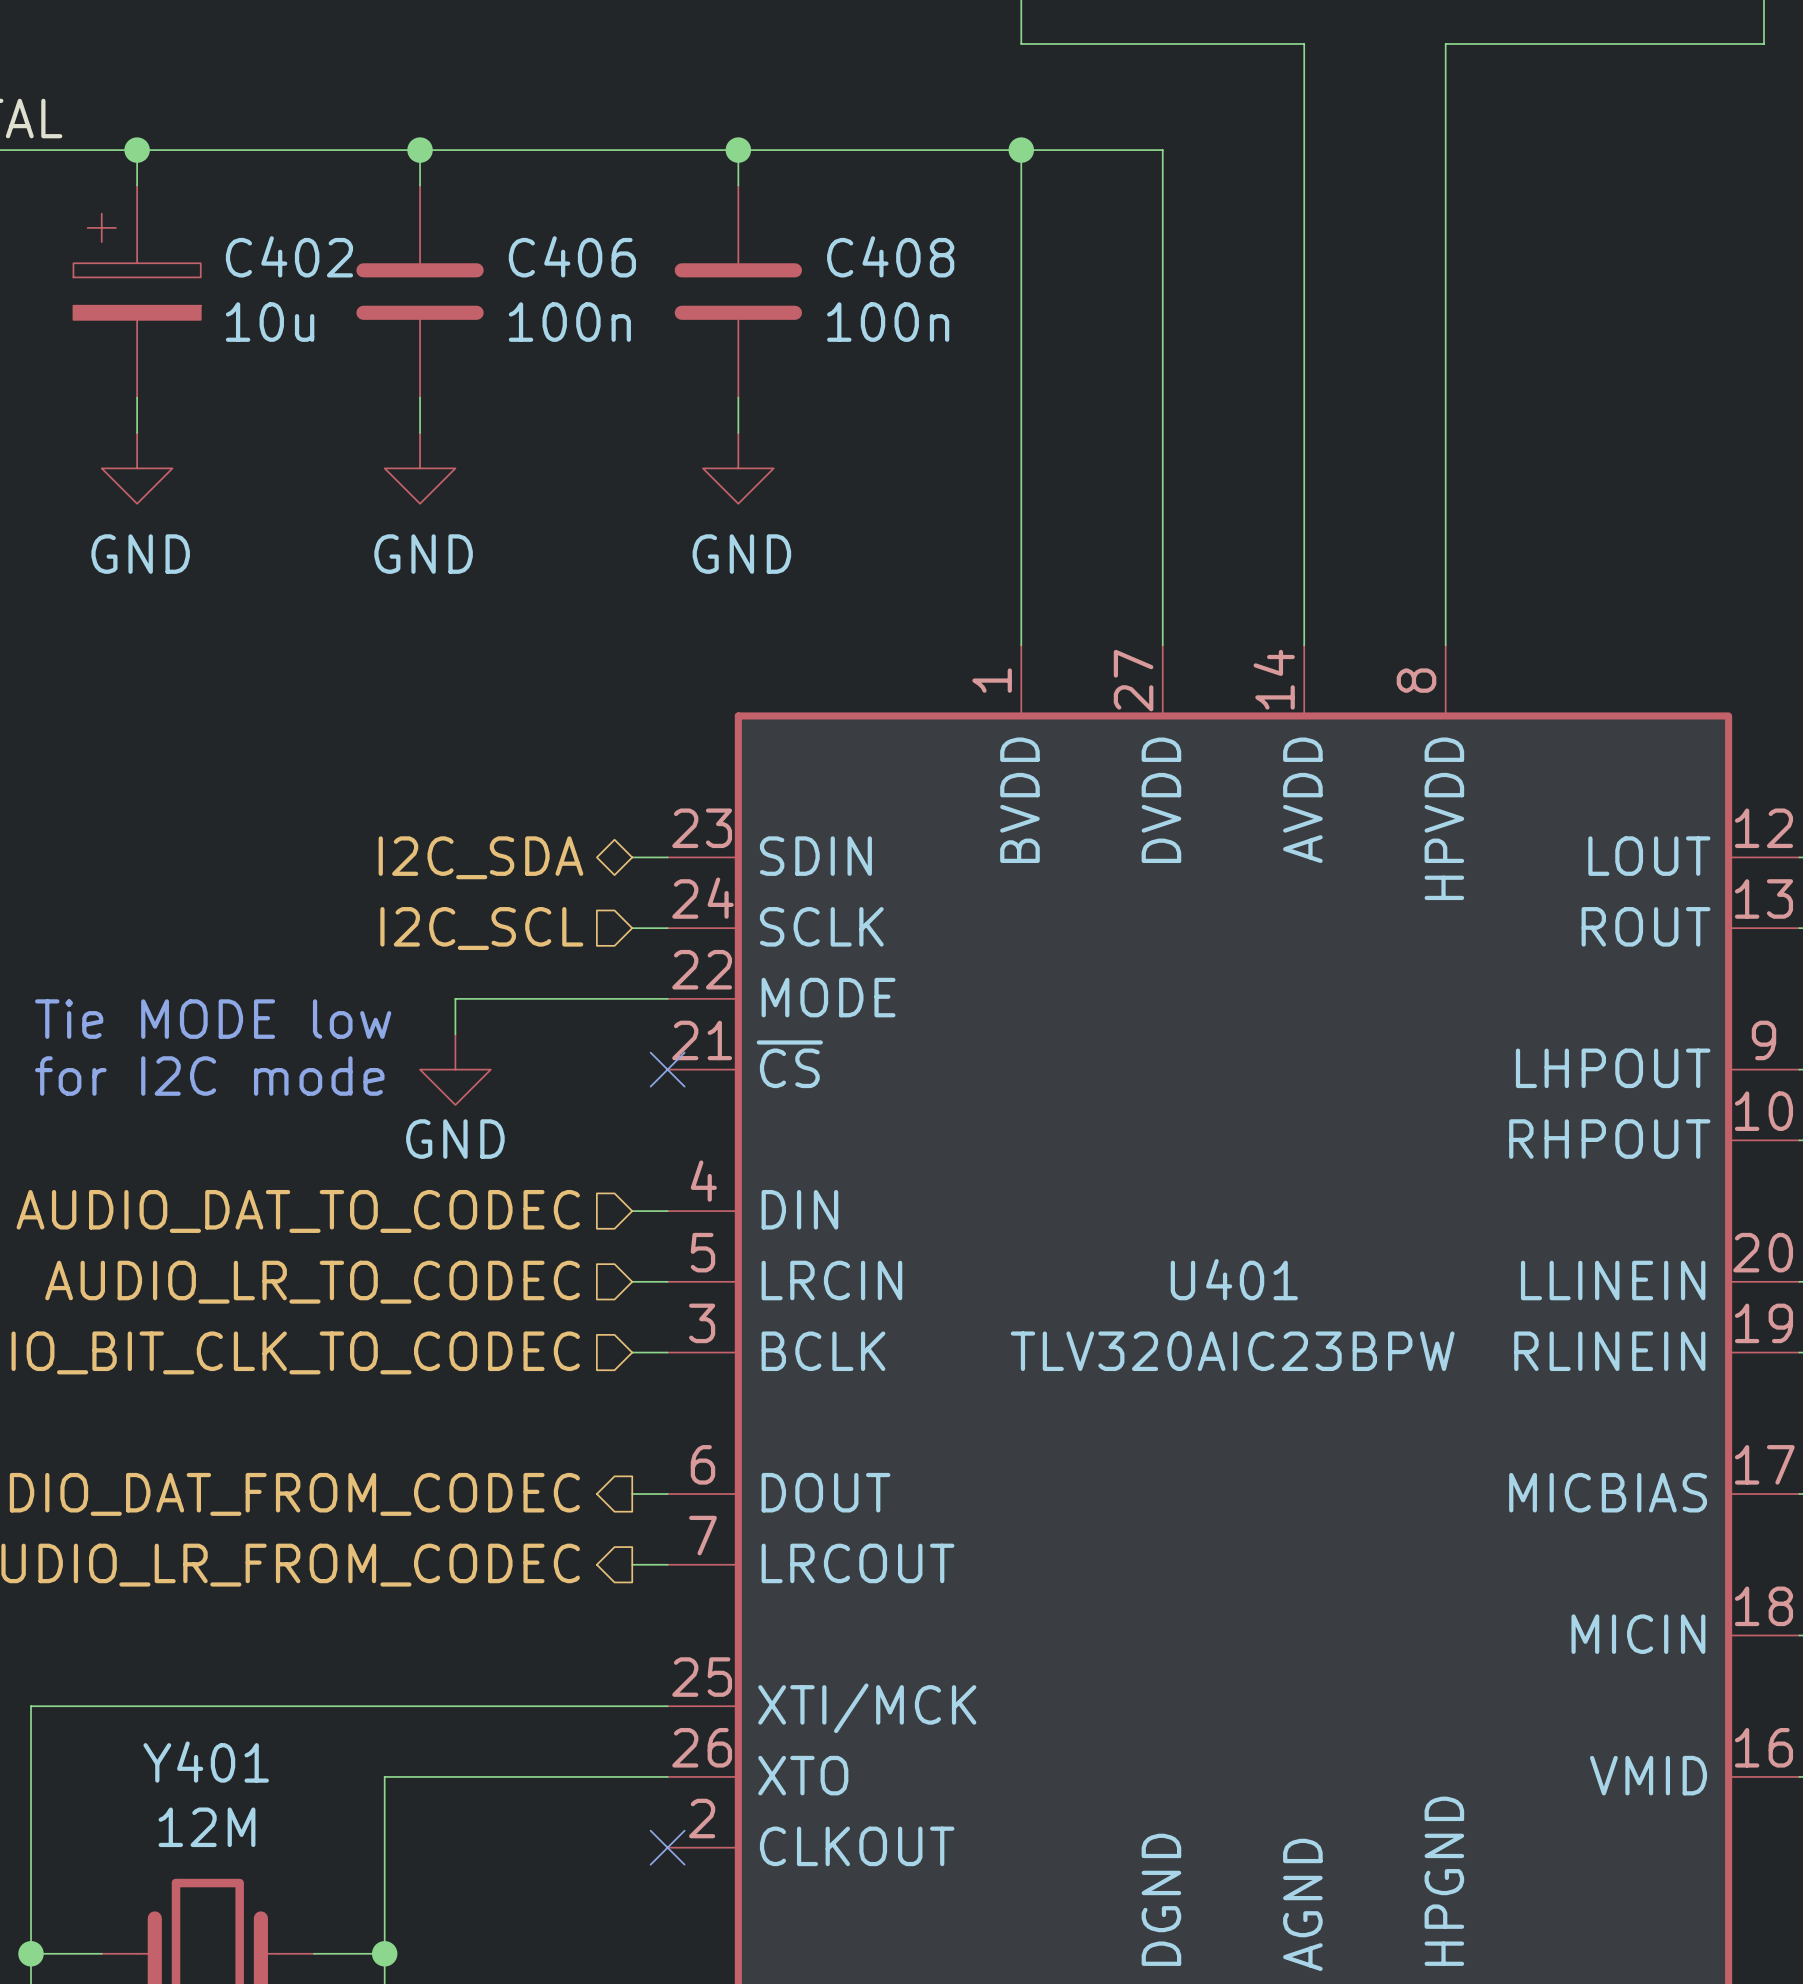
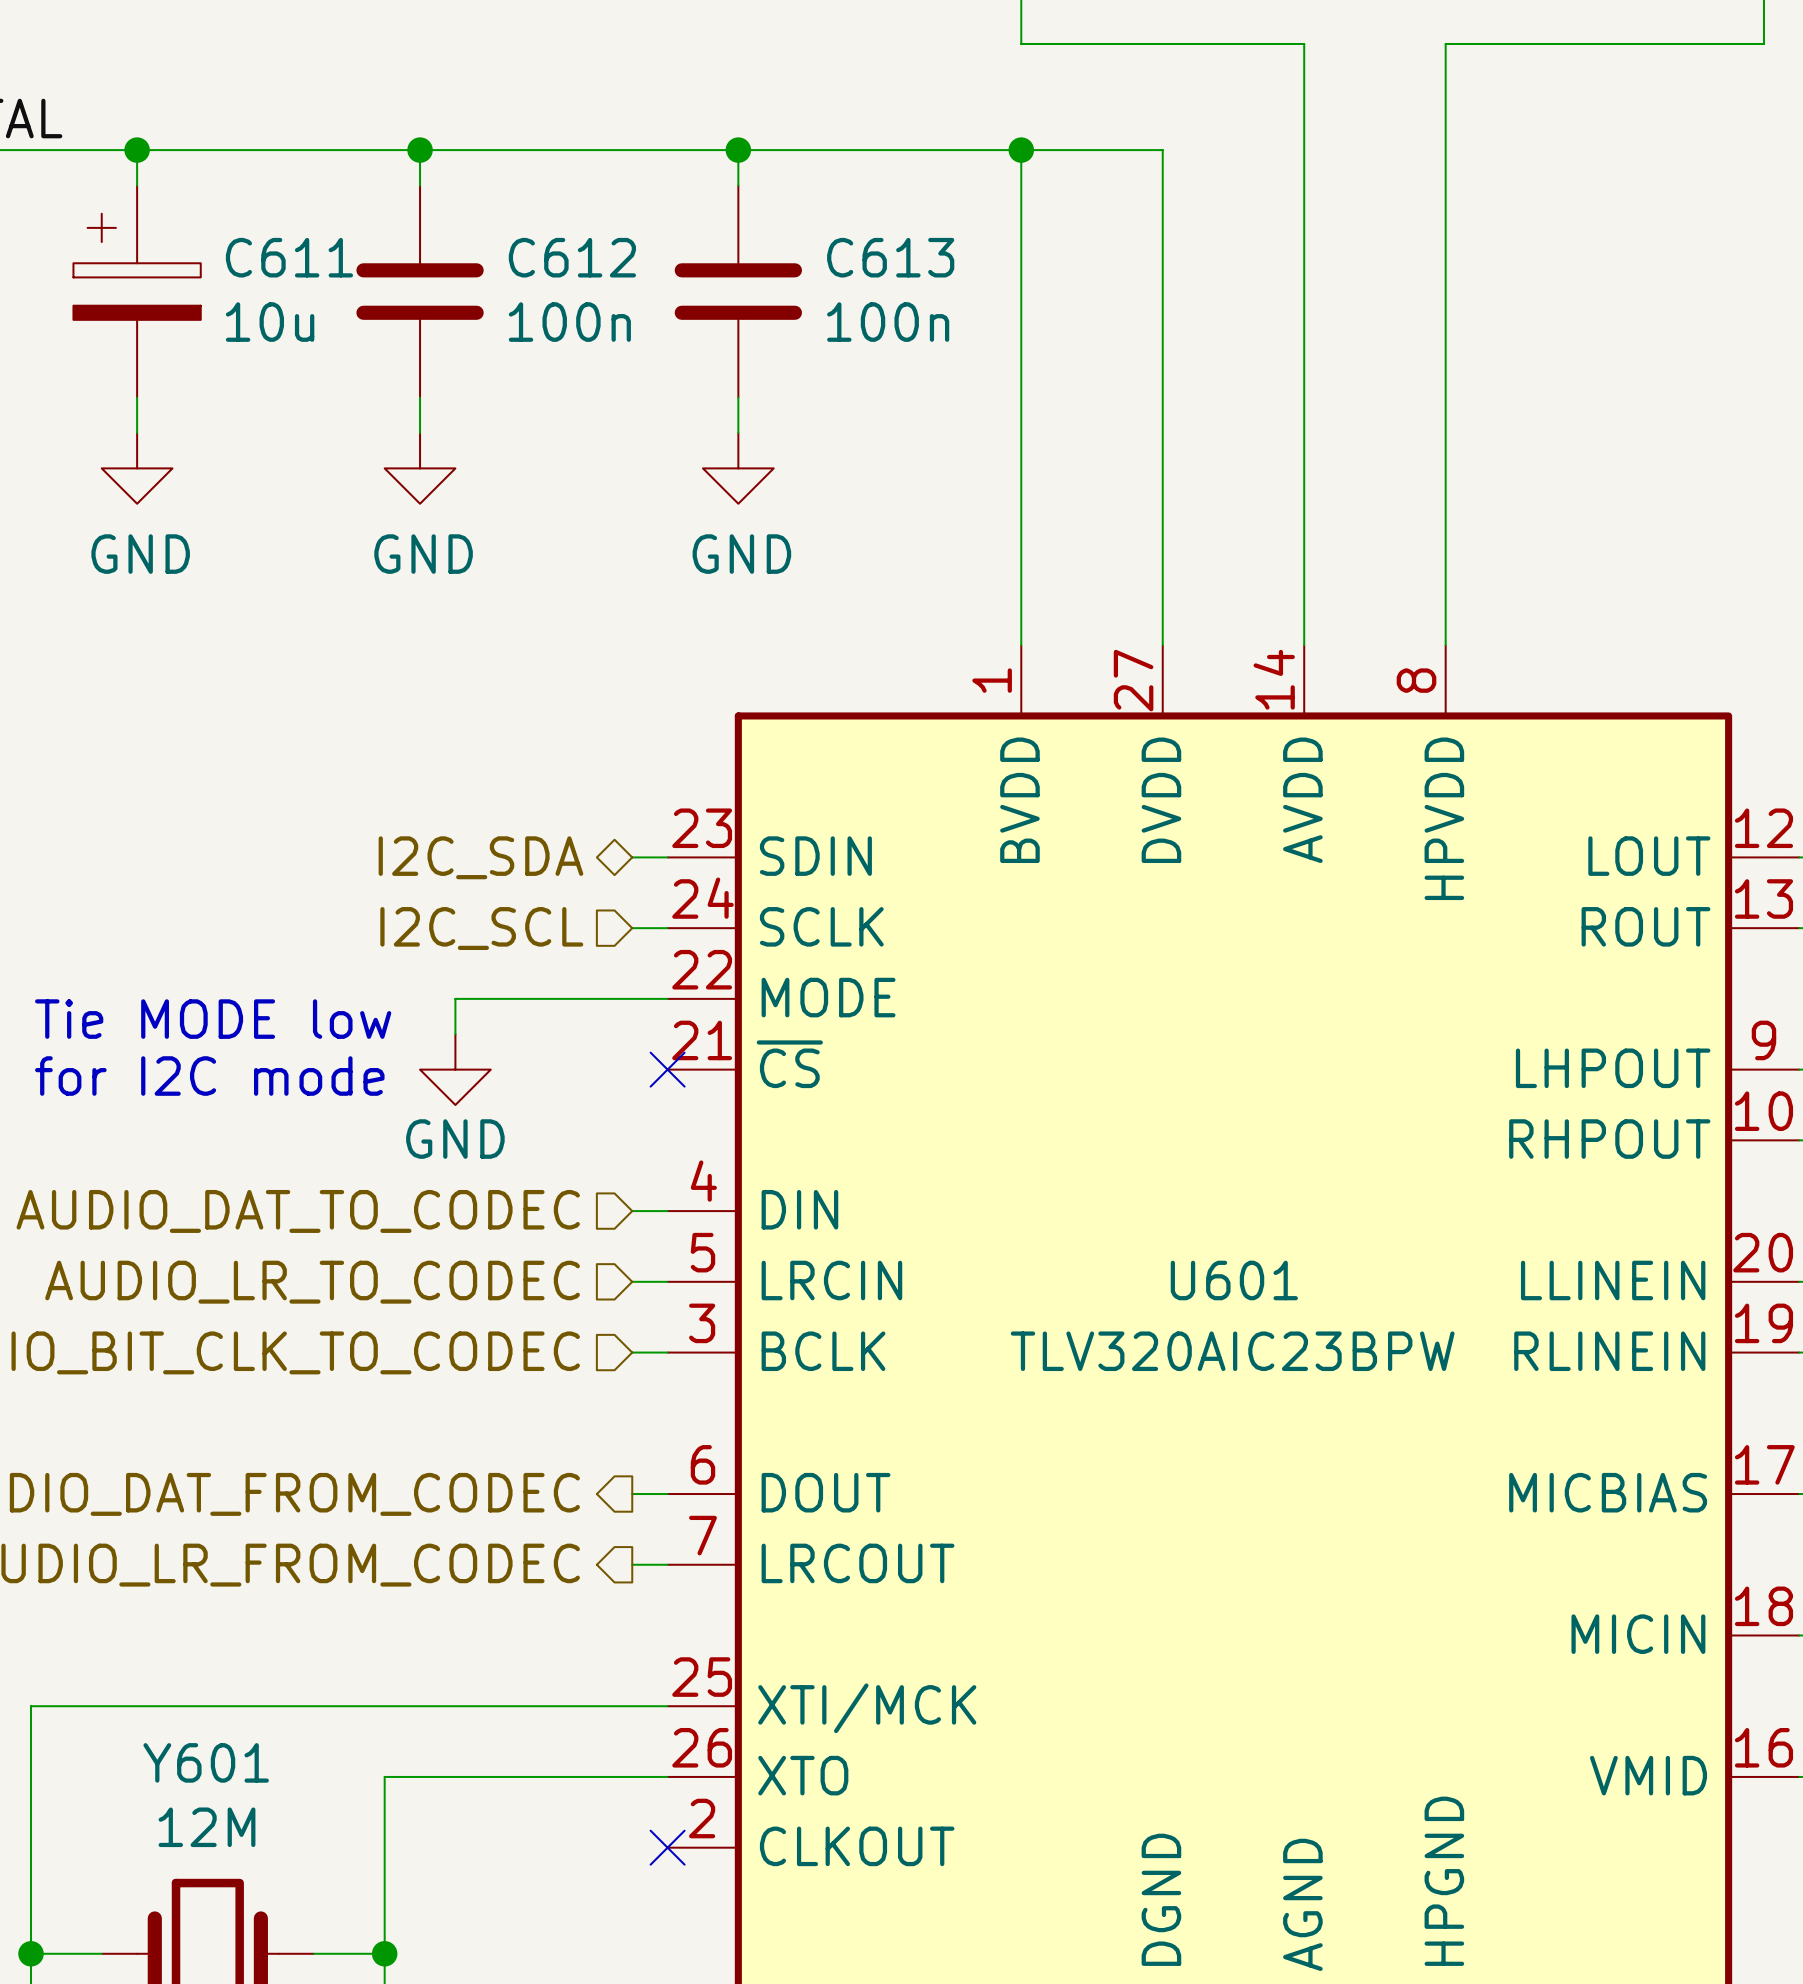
C402 name: C402 (289, 256) -> C611 (289, 257)
C406 name: C406 (572, 256) -> C612 (572, 257)
C408 name: C408 (890, 256) -> C613 (890, 257)
U401 name: U401 (1234, 1279) -> U601 (1234, 1280)
Y401 name: Y401 (206, 1762) -> Y601 (206, 1762)

